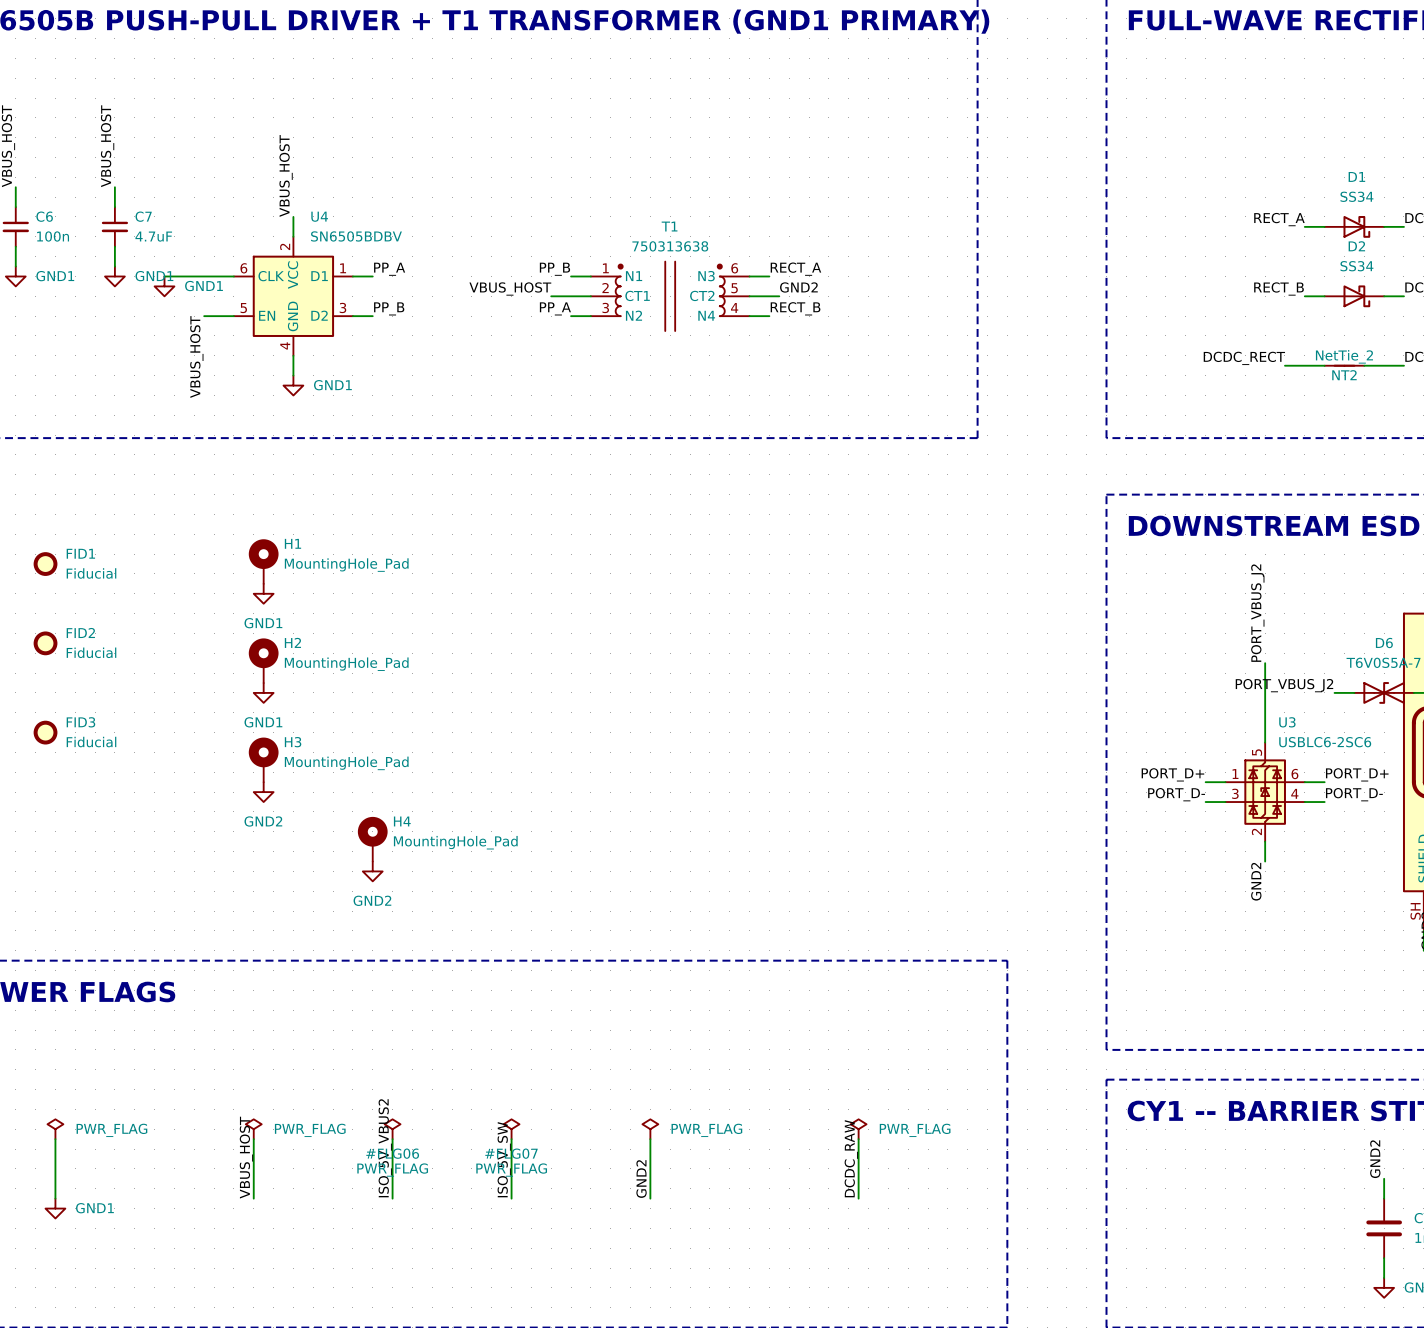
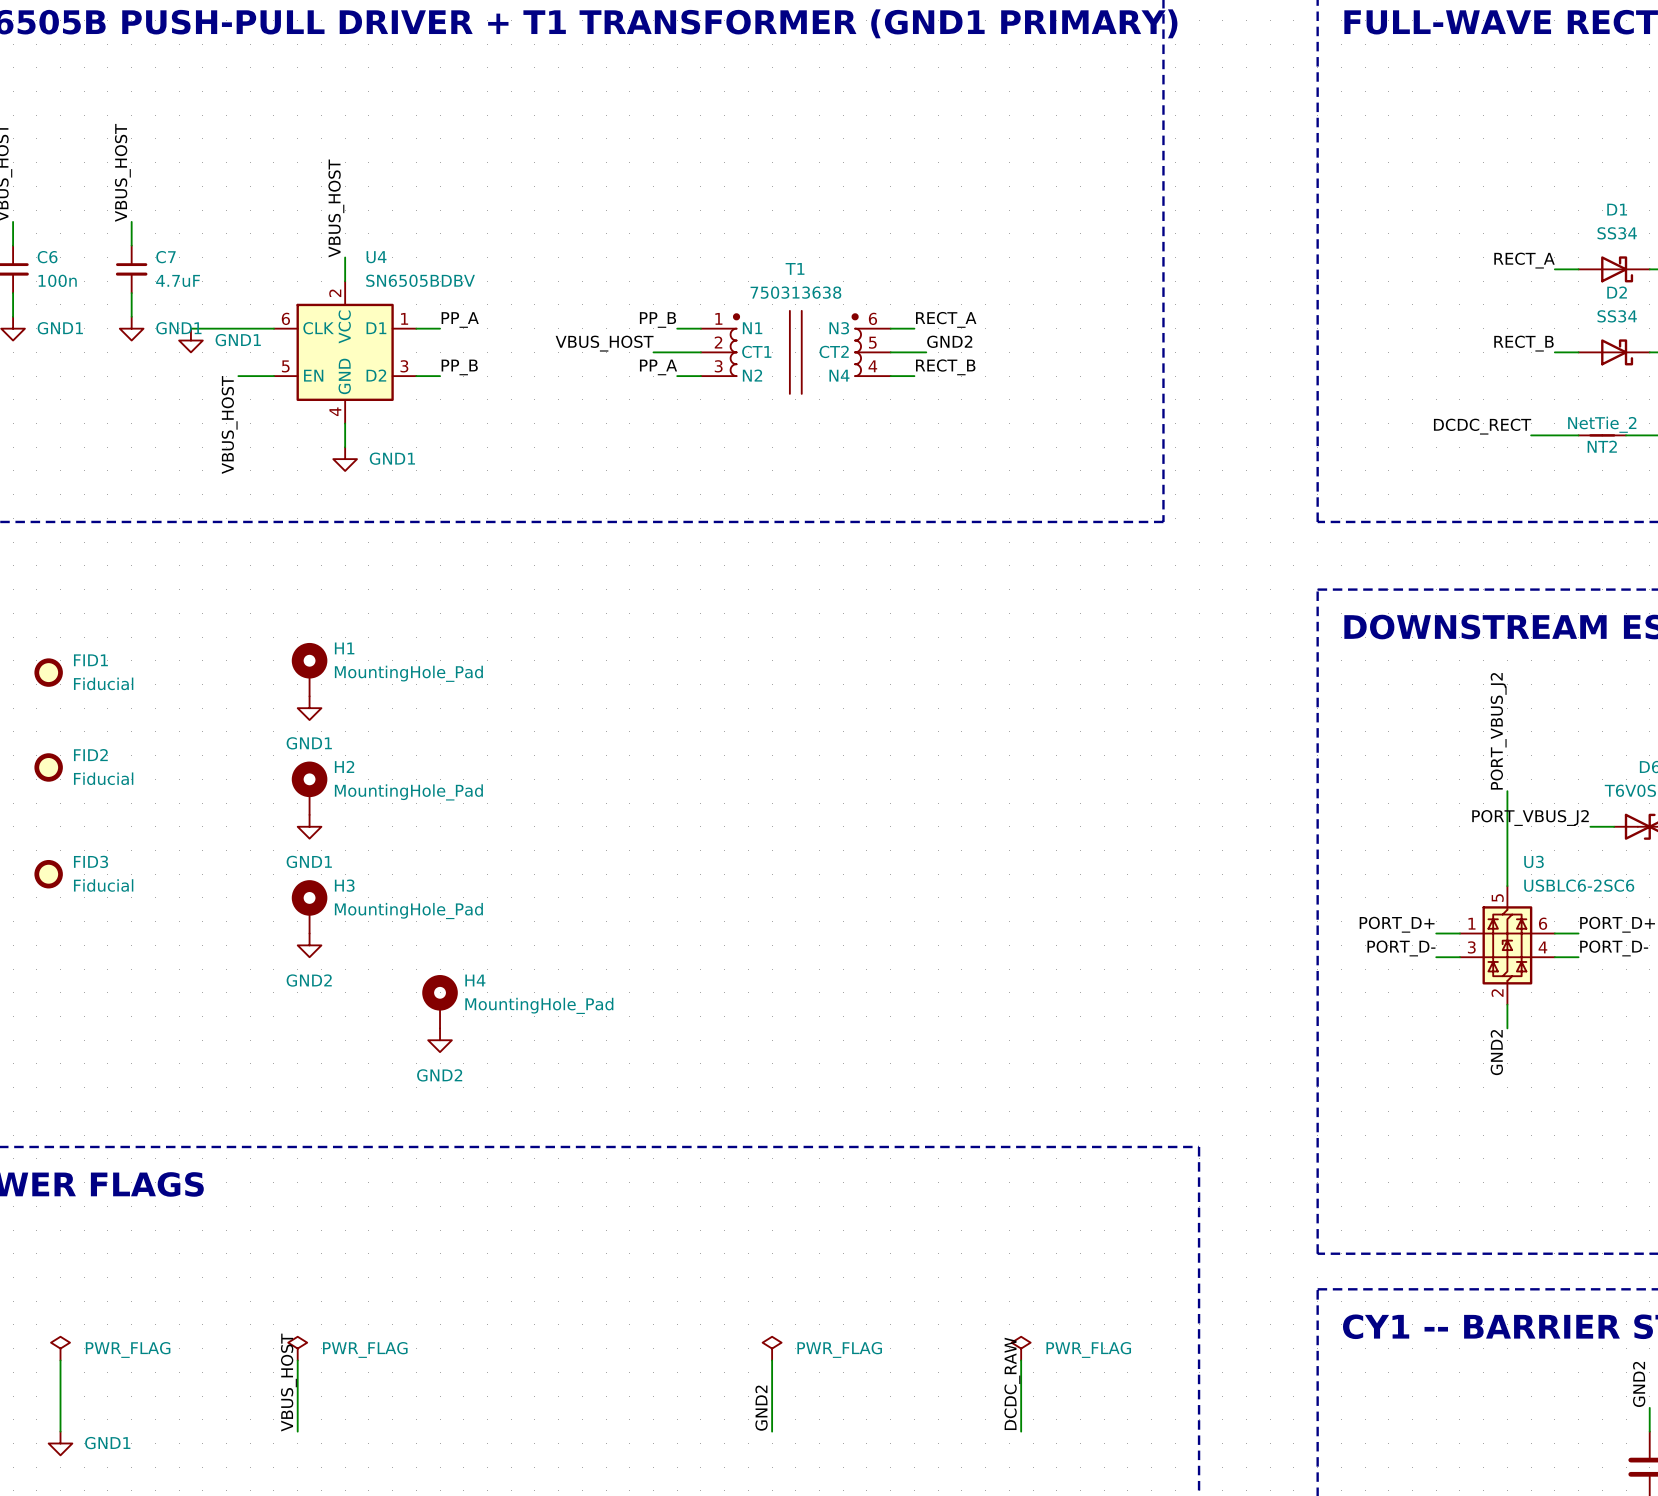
#FLG06: PWR_FLAG (392, 1129) -> none
#FLG07: PWR_FLAG (511, 1129) -> none
wire: (392, 1139) (392, 1198) -> none
wire: (511, 1139) (511, 1198) -> none
label: ISO_5V_VBUS2 (385, 1148) -> none
label: ISO_5V_SW (504, 1159) -> none

